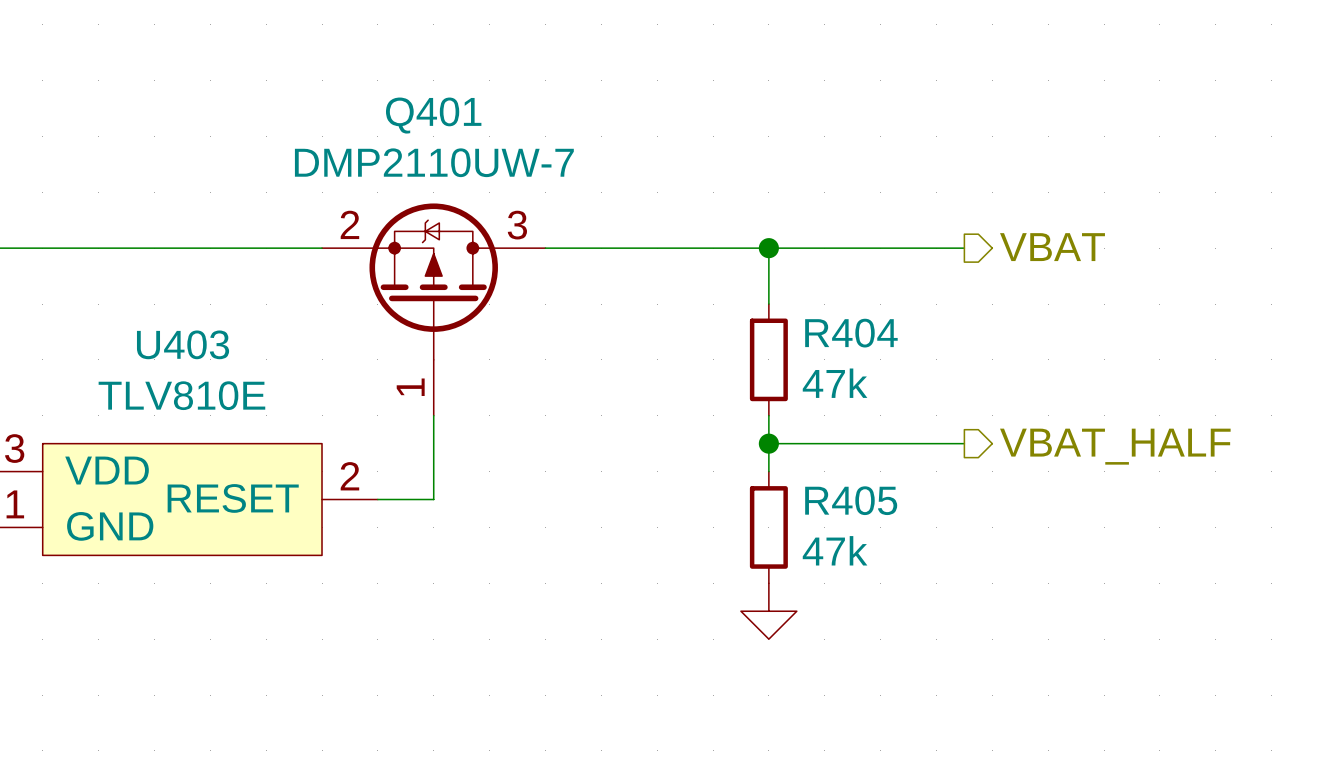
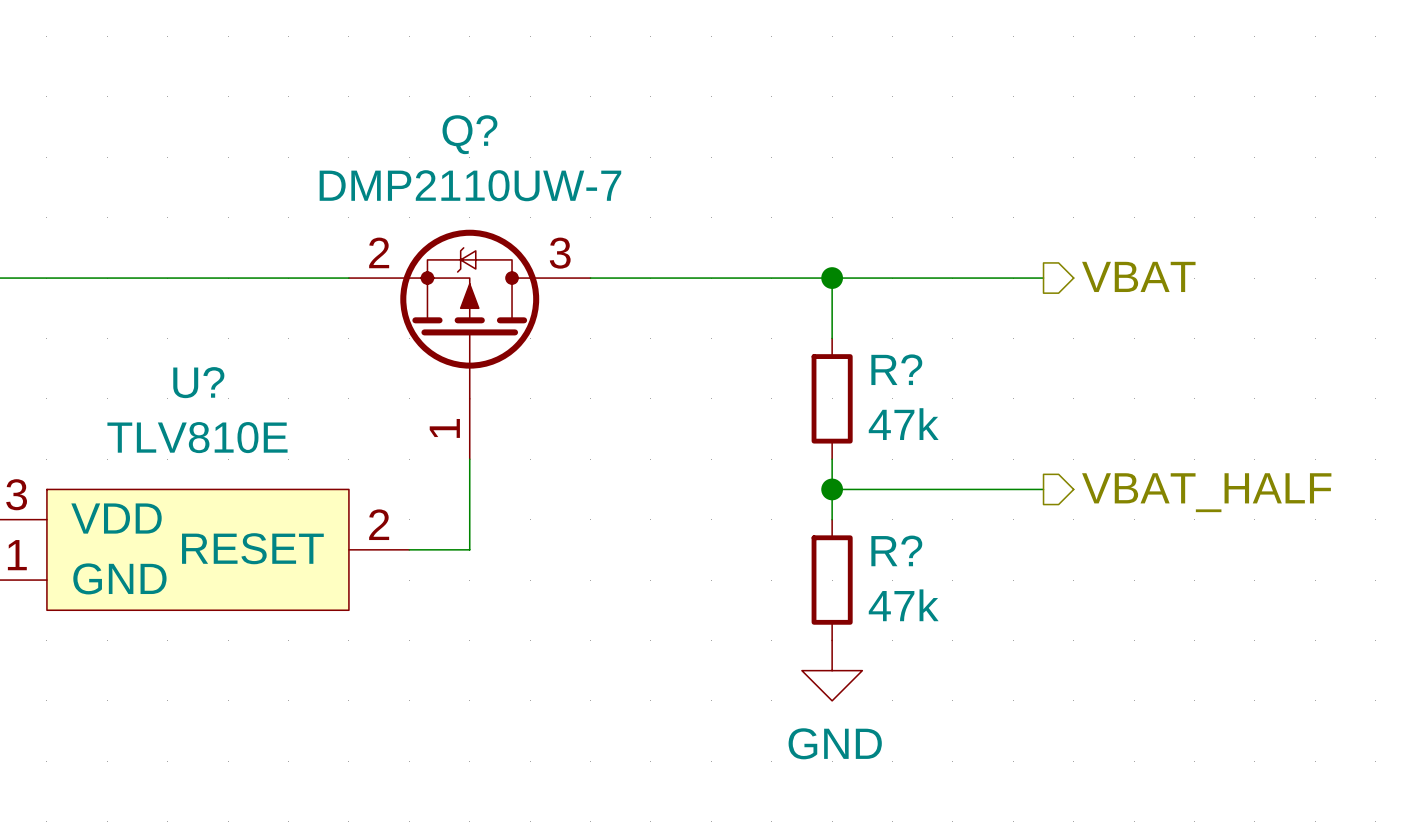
Q401 name: Q401 (433, 115) -> Q? (469, 134)
R404 name: R404 (851, 333) -> R? (896, 369)
U403 name: U403 (183, 344) -> U? (198, 382)
R405 name: R405 (851, 500) -> R? (896, 550)
power symbol text: none -> GND (835, 743)

